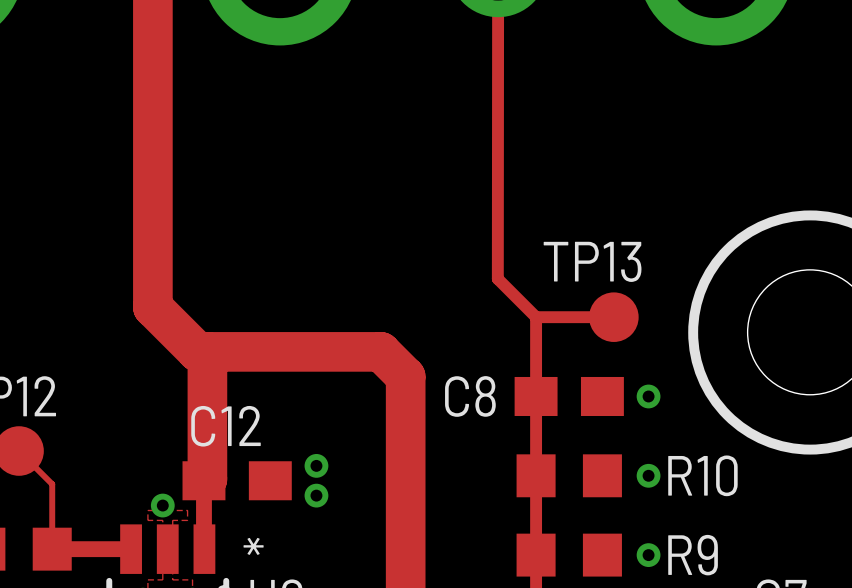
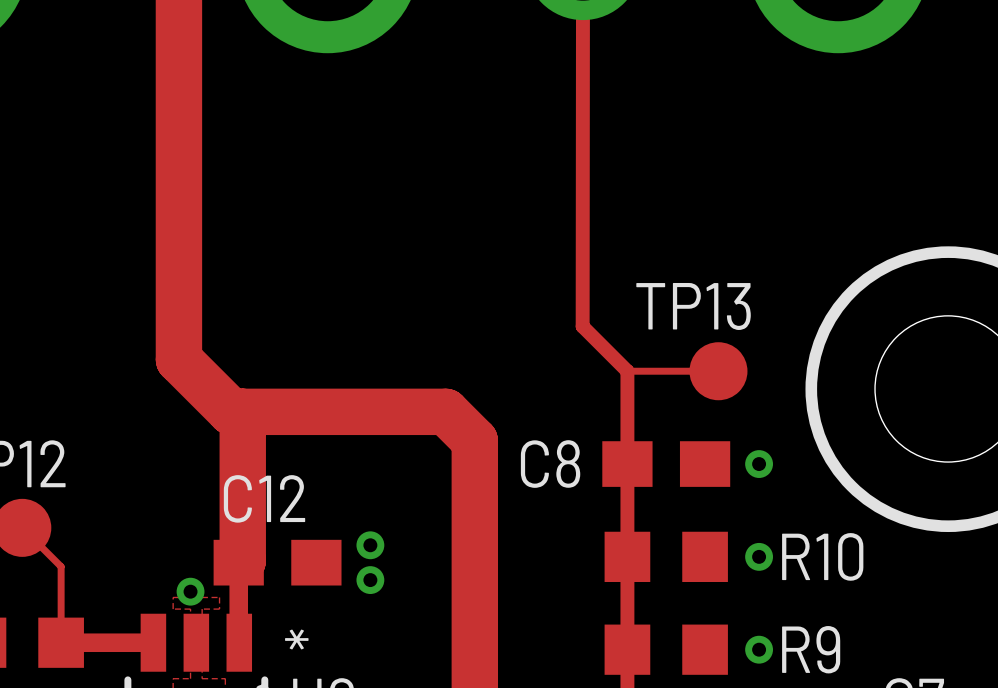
track width: thick (536, 317) (613, 317) -> thin (627, 371) (718, 371)

